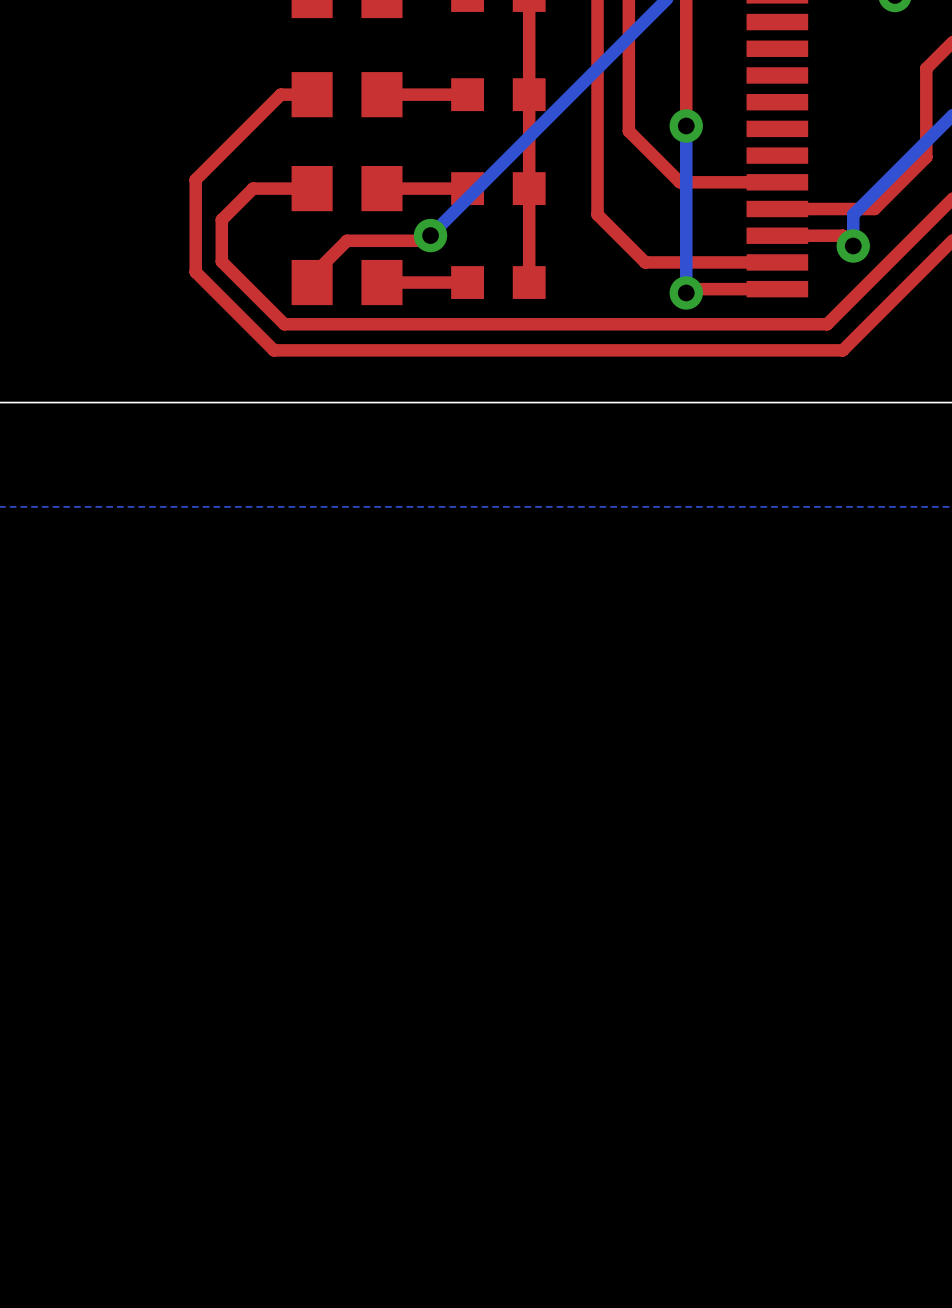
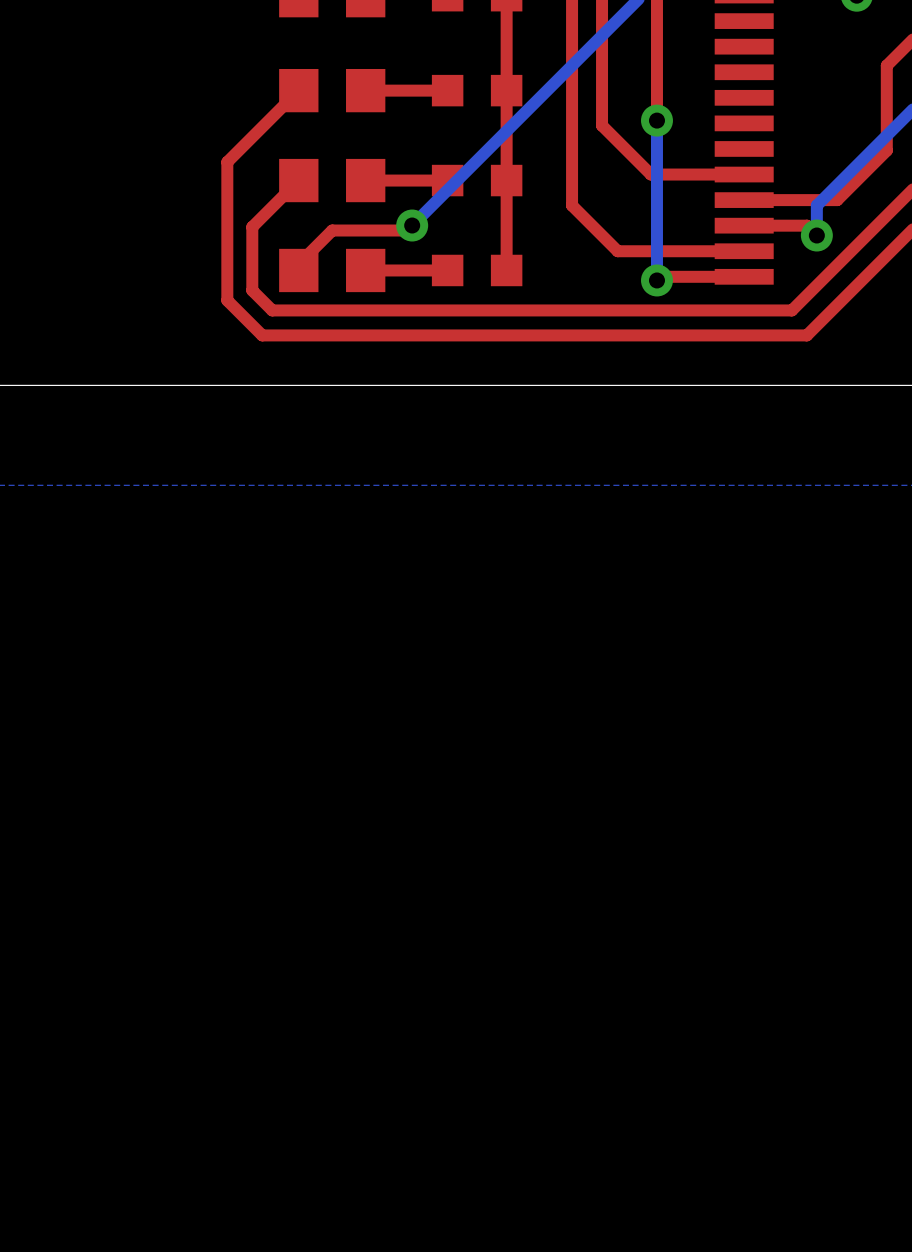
top track: (312, 94) (280, 94) (195, 179) (195, 272) (237, 313) -> (298, 90) (227, 162) (227, 300)
top track: (312, 188) (253, 188) (221, 219) (221, 261) (263, 303) -> (298, 180) (252, 227) (252, 290)

